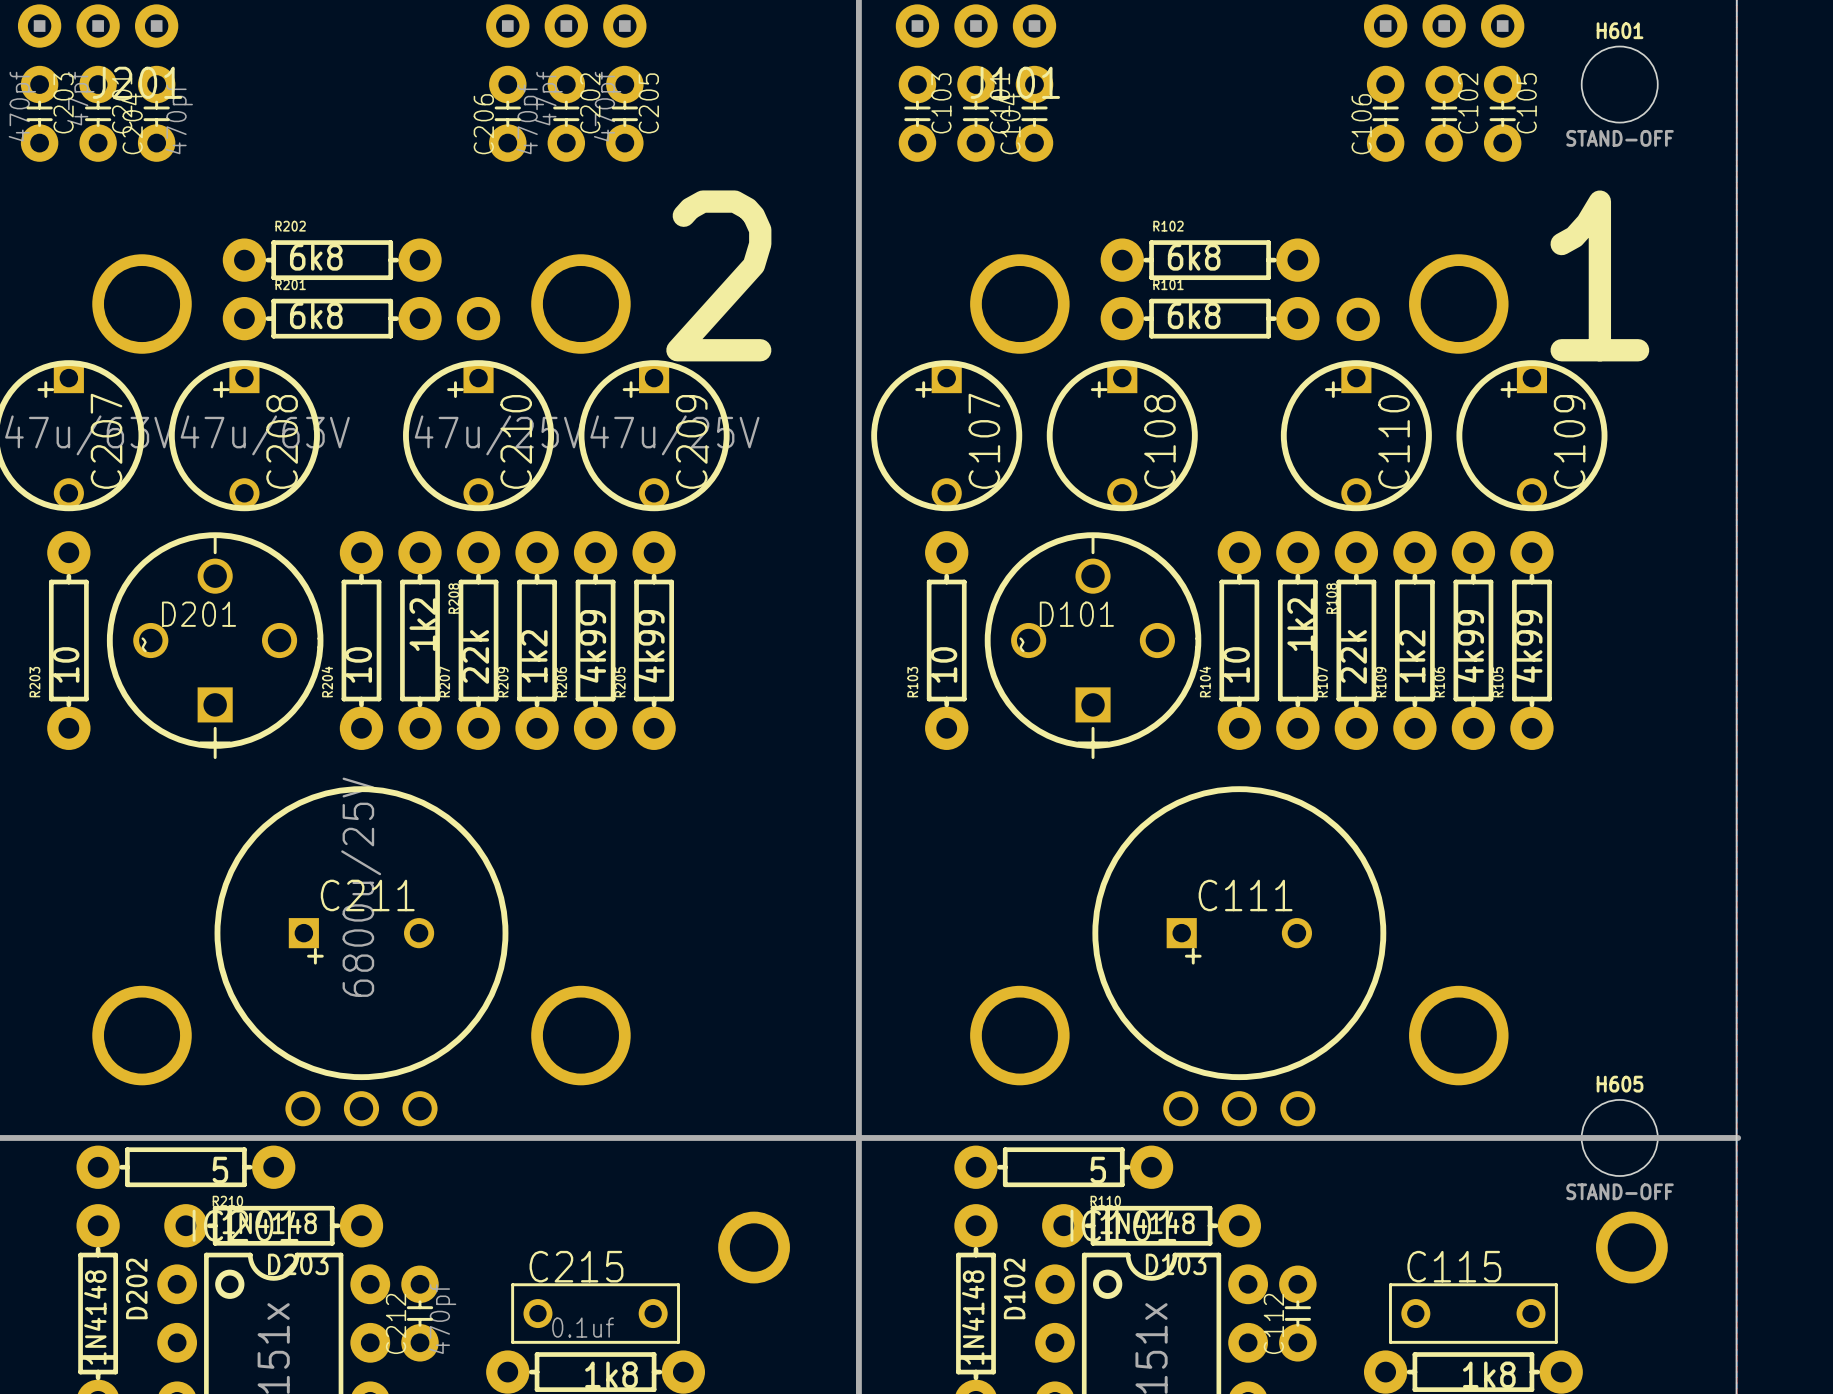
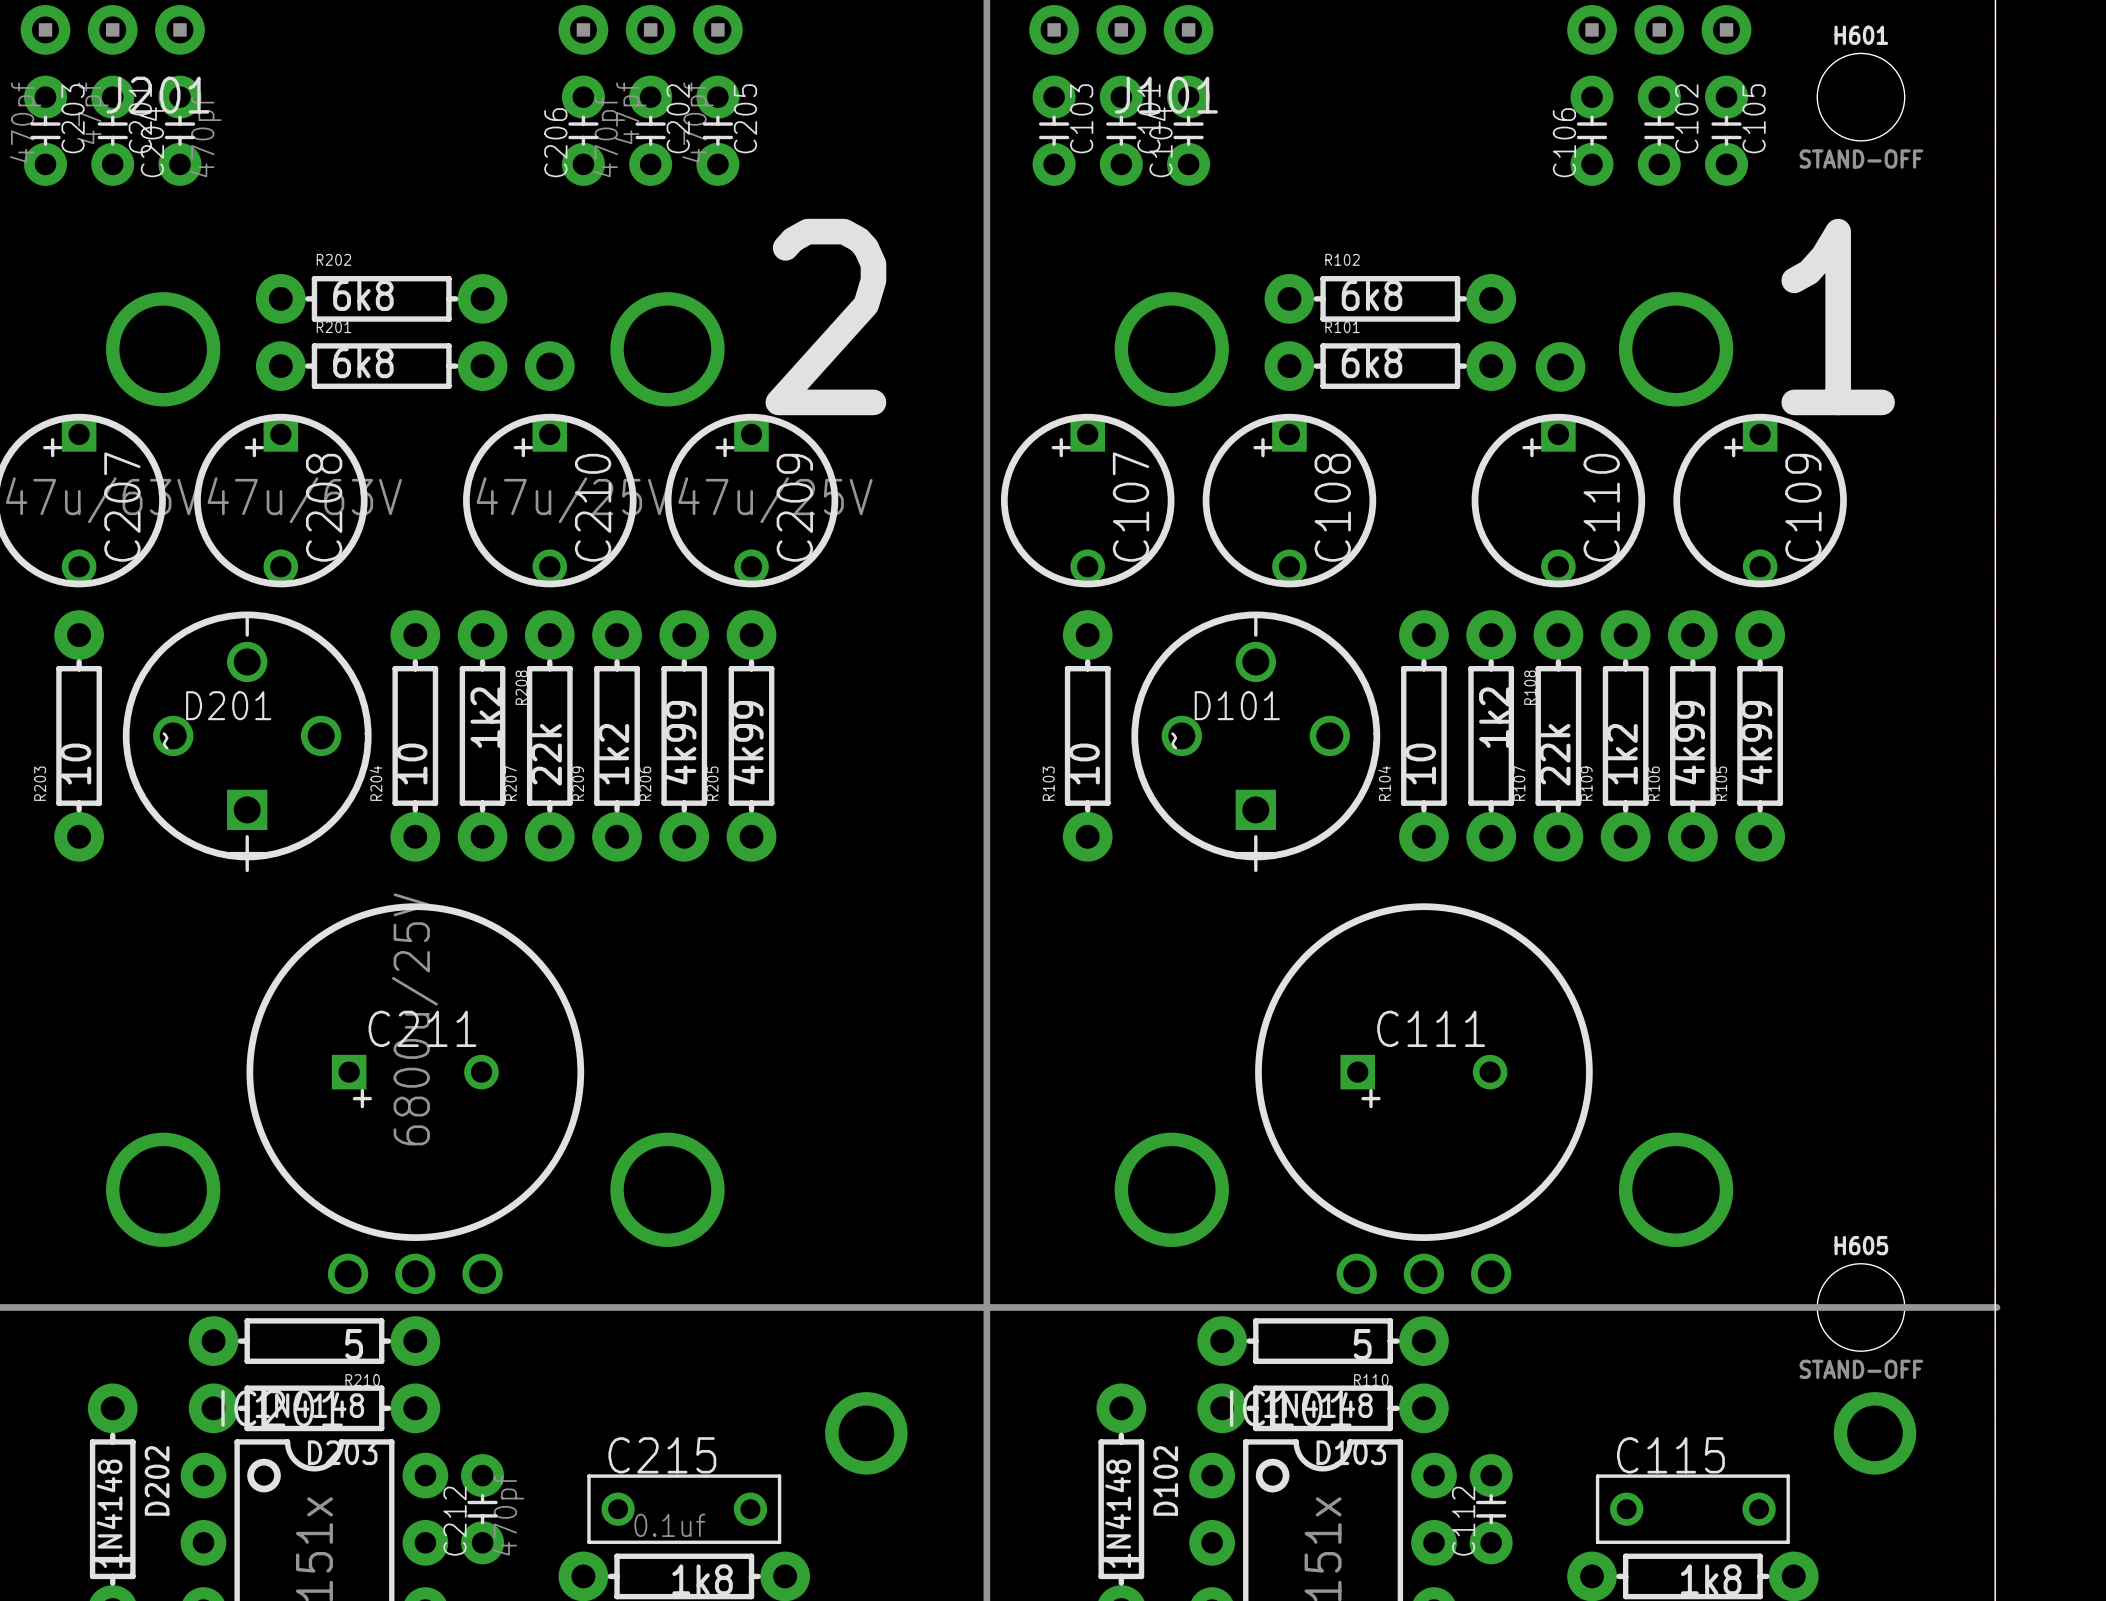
R210 position: (185, 1167) -> (314, 1341)
R110 position: (1063, 1167) -> (1323, 1341)

